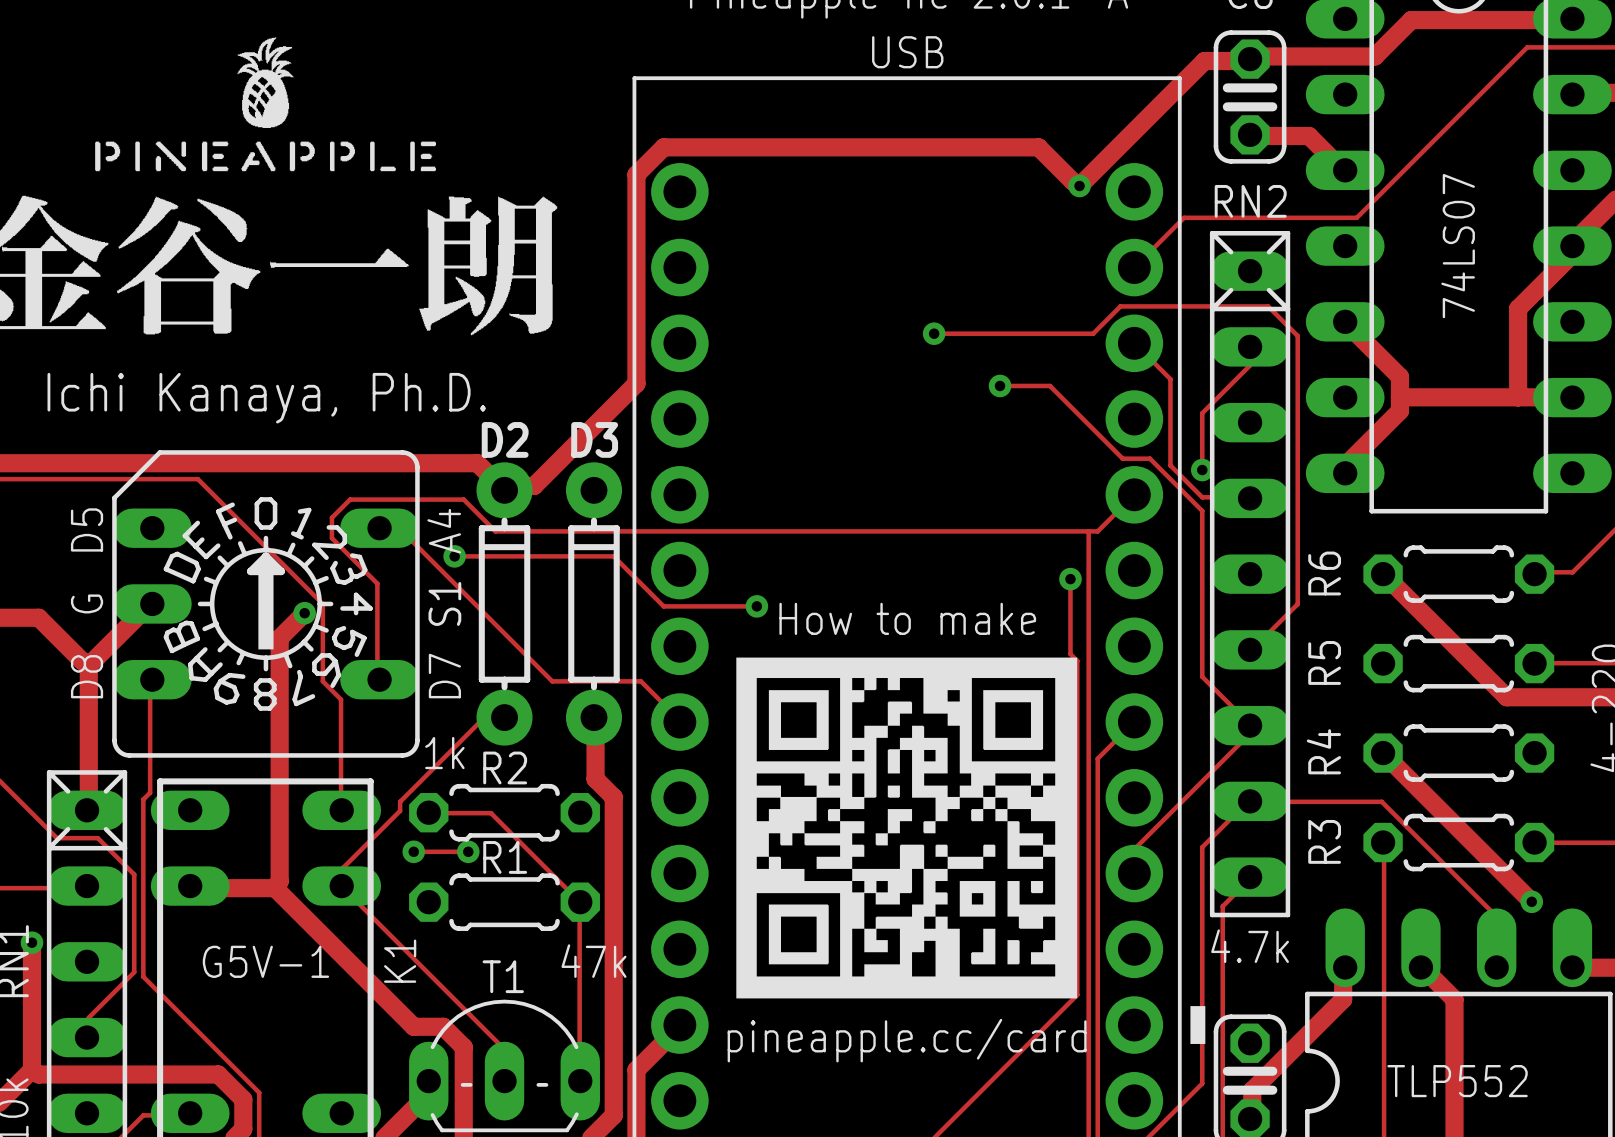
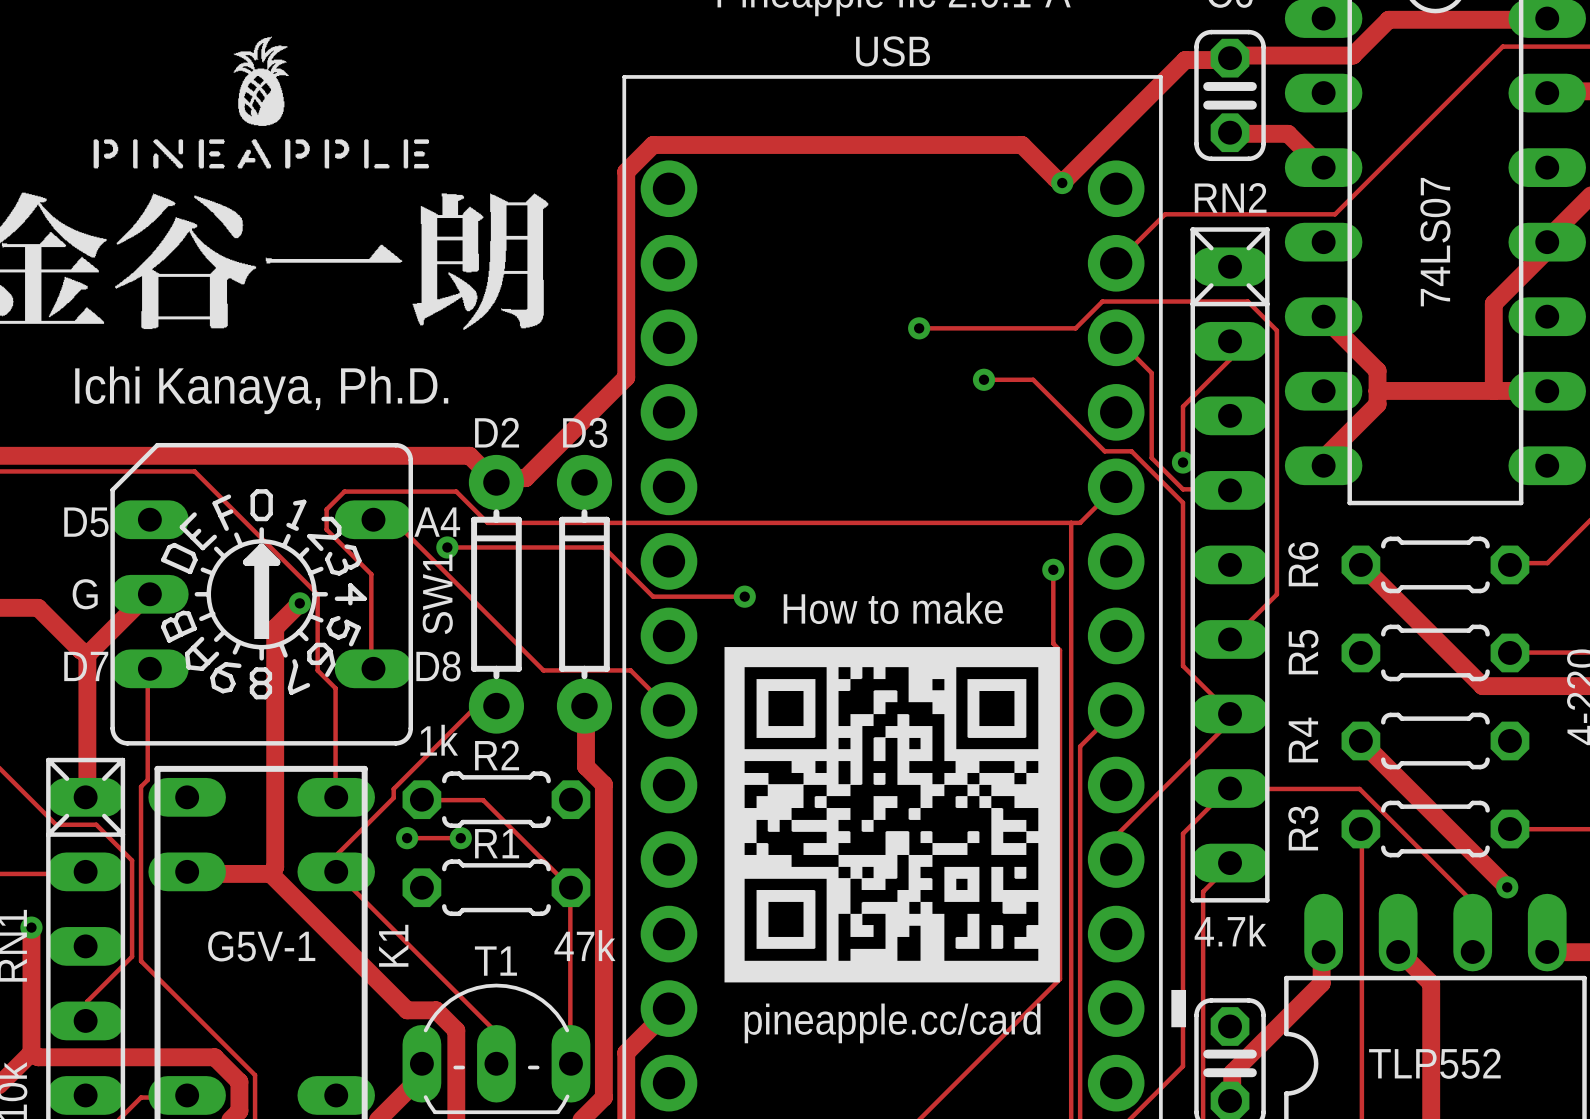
text rotation: 0° (87, 529) -> 90° clockwise (86, 522)
text rotation: 0° (444, 531) -> 90° clockwise (437, 522)
text rotation: 0° (87, 603) -> 90° clockwise (85, 594)
S1 name: S1 (444, 603) -> SW1 (437, 594)
text: D8 (87, 676) -> D7 (86, 666)
text: D7 (444, 676) -> D8 (438, 666)

